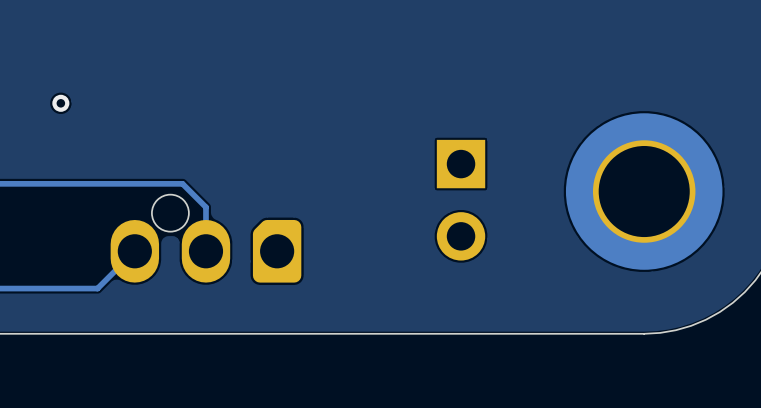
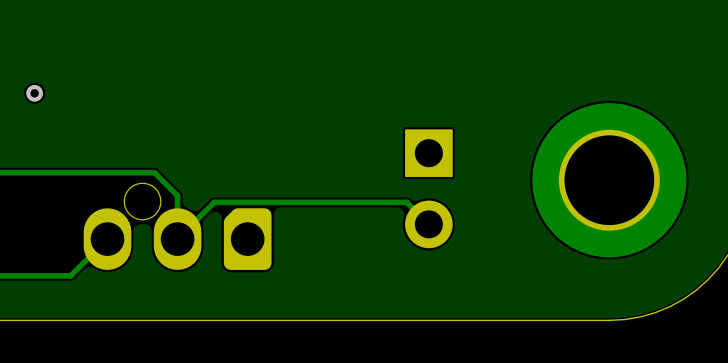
track: none -> (428, 224) (406, 202) (214, 202) (177, 239)

